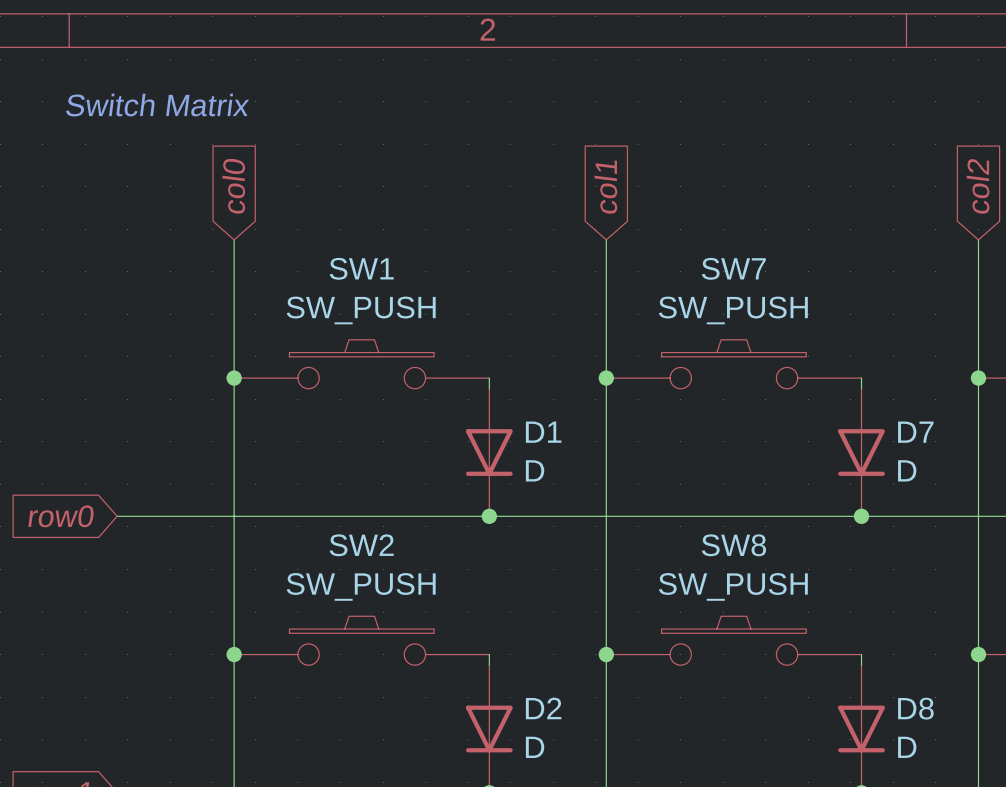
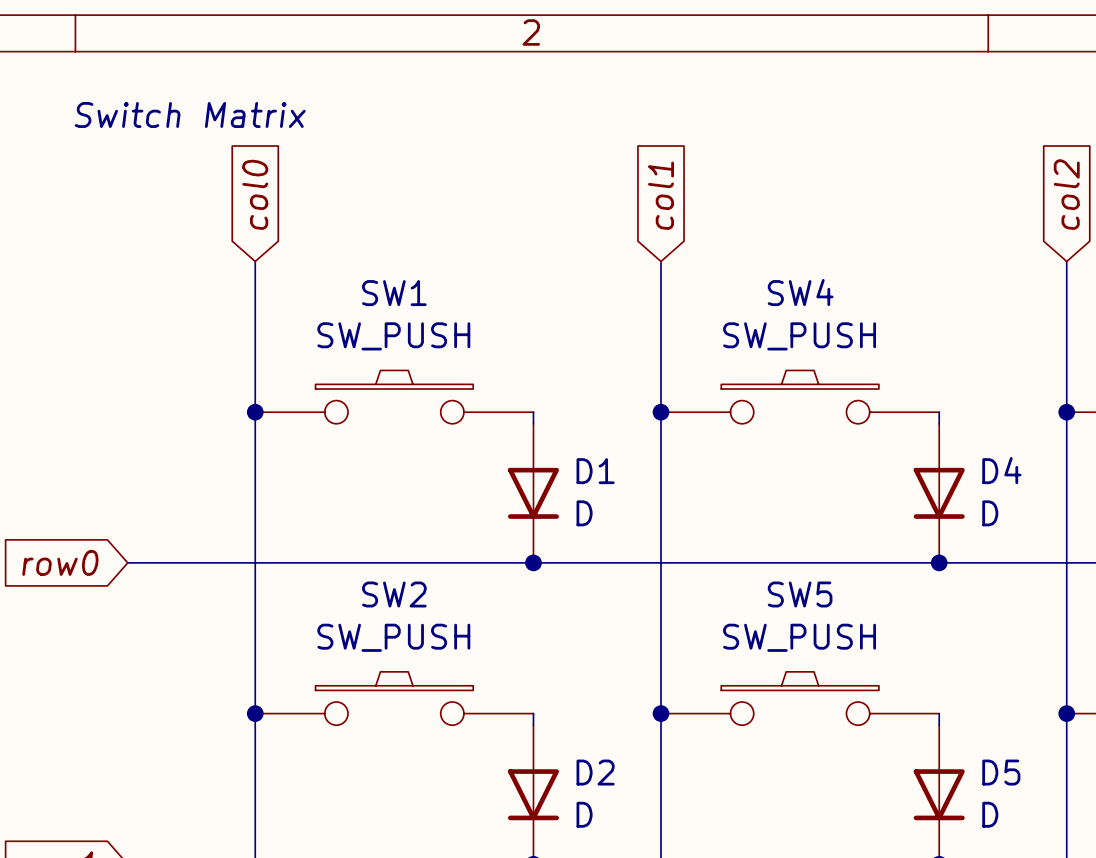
SW7 name: SW7 (733, 268) -> SW4 (800, 292)
D7 name: D7 (915, 432) -> D4 (1001, 470)
SW8 name: SW8 (733, 545) -> SW5 (800, 594)
D8 name: D8 (915, 708) -> D5 (1001, 772)

